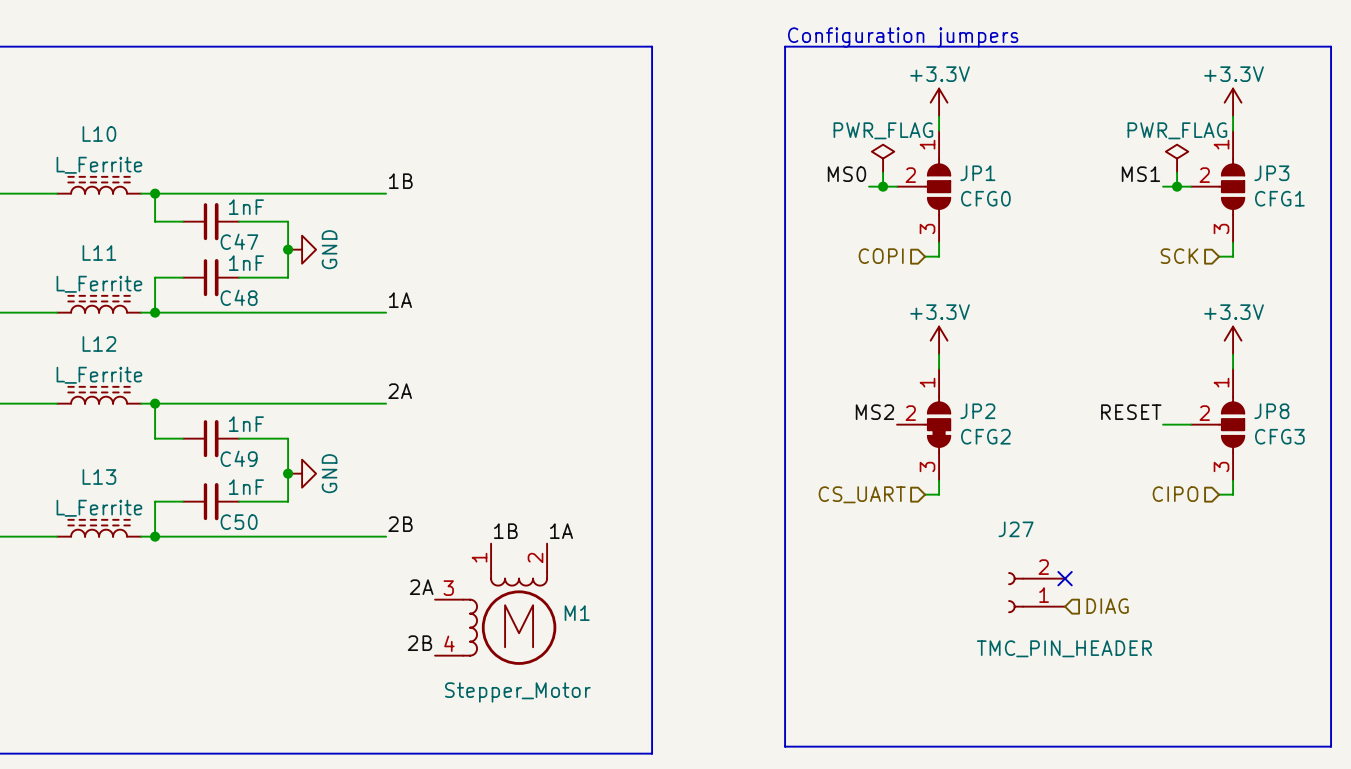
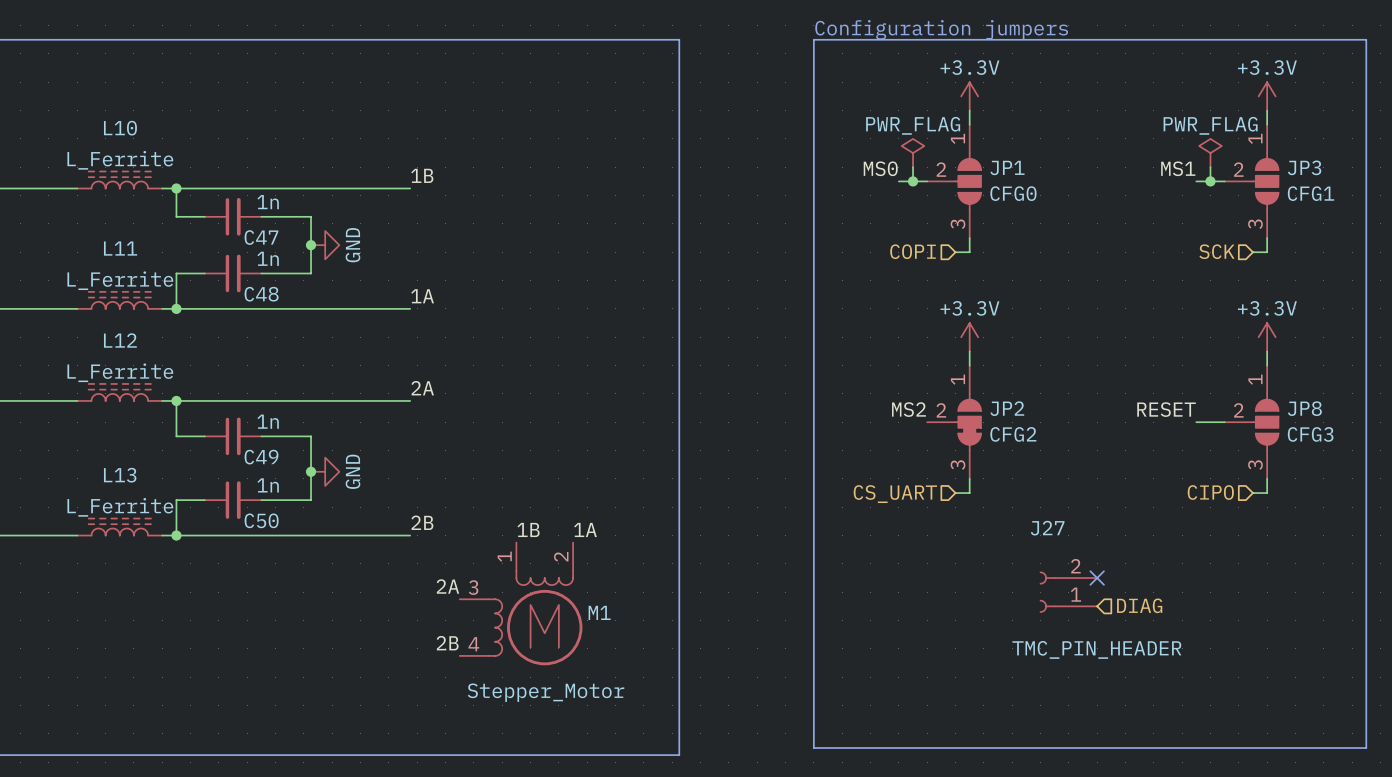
C47 value: 1nF (246, 207) -> 1n (268, 202)
C48 value: 1nF (246, 263) -> 1n (268, 258)
C49 value: 1nF (246, 424) -> 1n (268, 421)
C50 value: 1nF (246, 487) -> 1n (268, 485)

